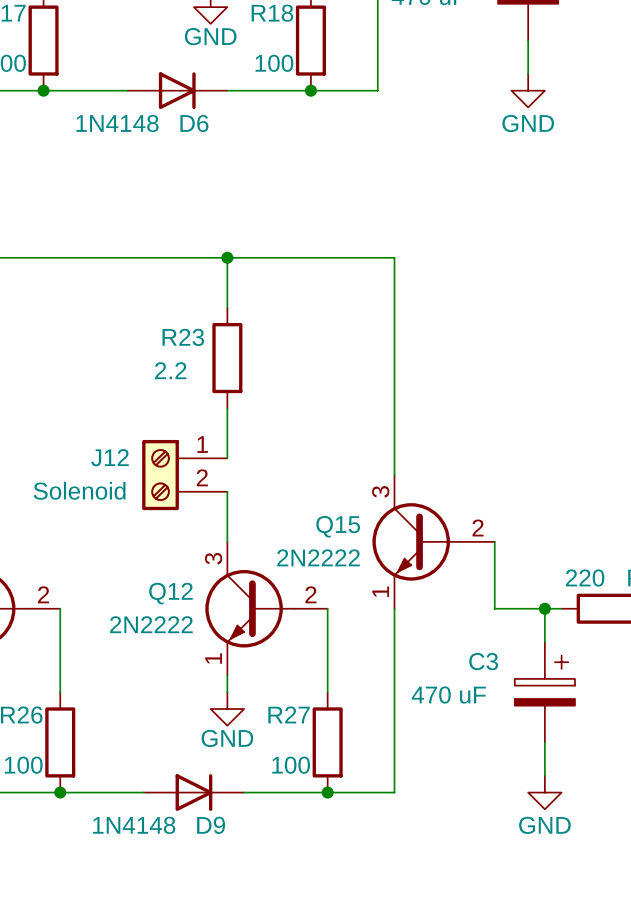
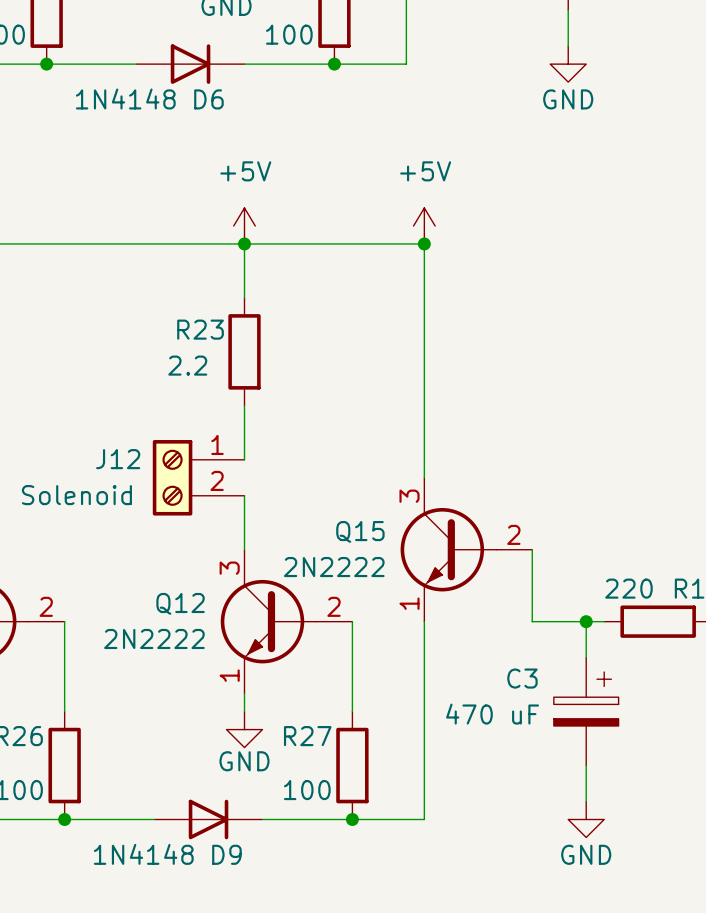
power symbol: none -> +5V (244, 225)
power symbol: none -> +5V (424, 225)
junction: none -> (424, 243)

